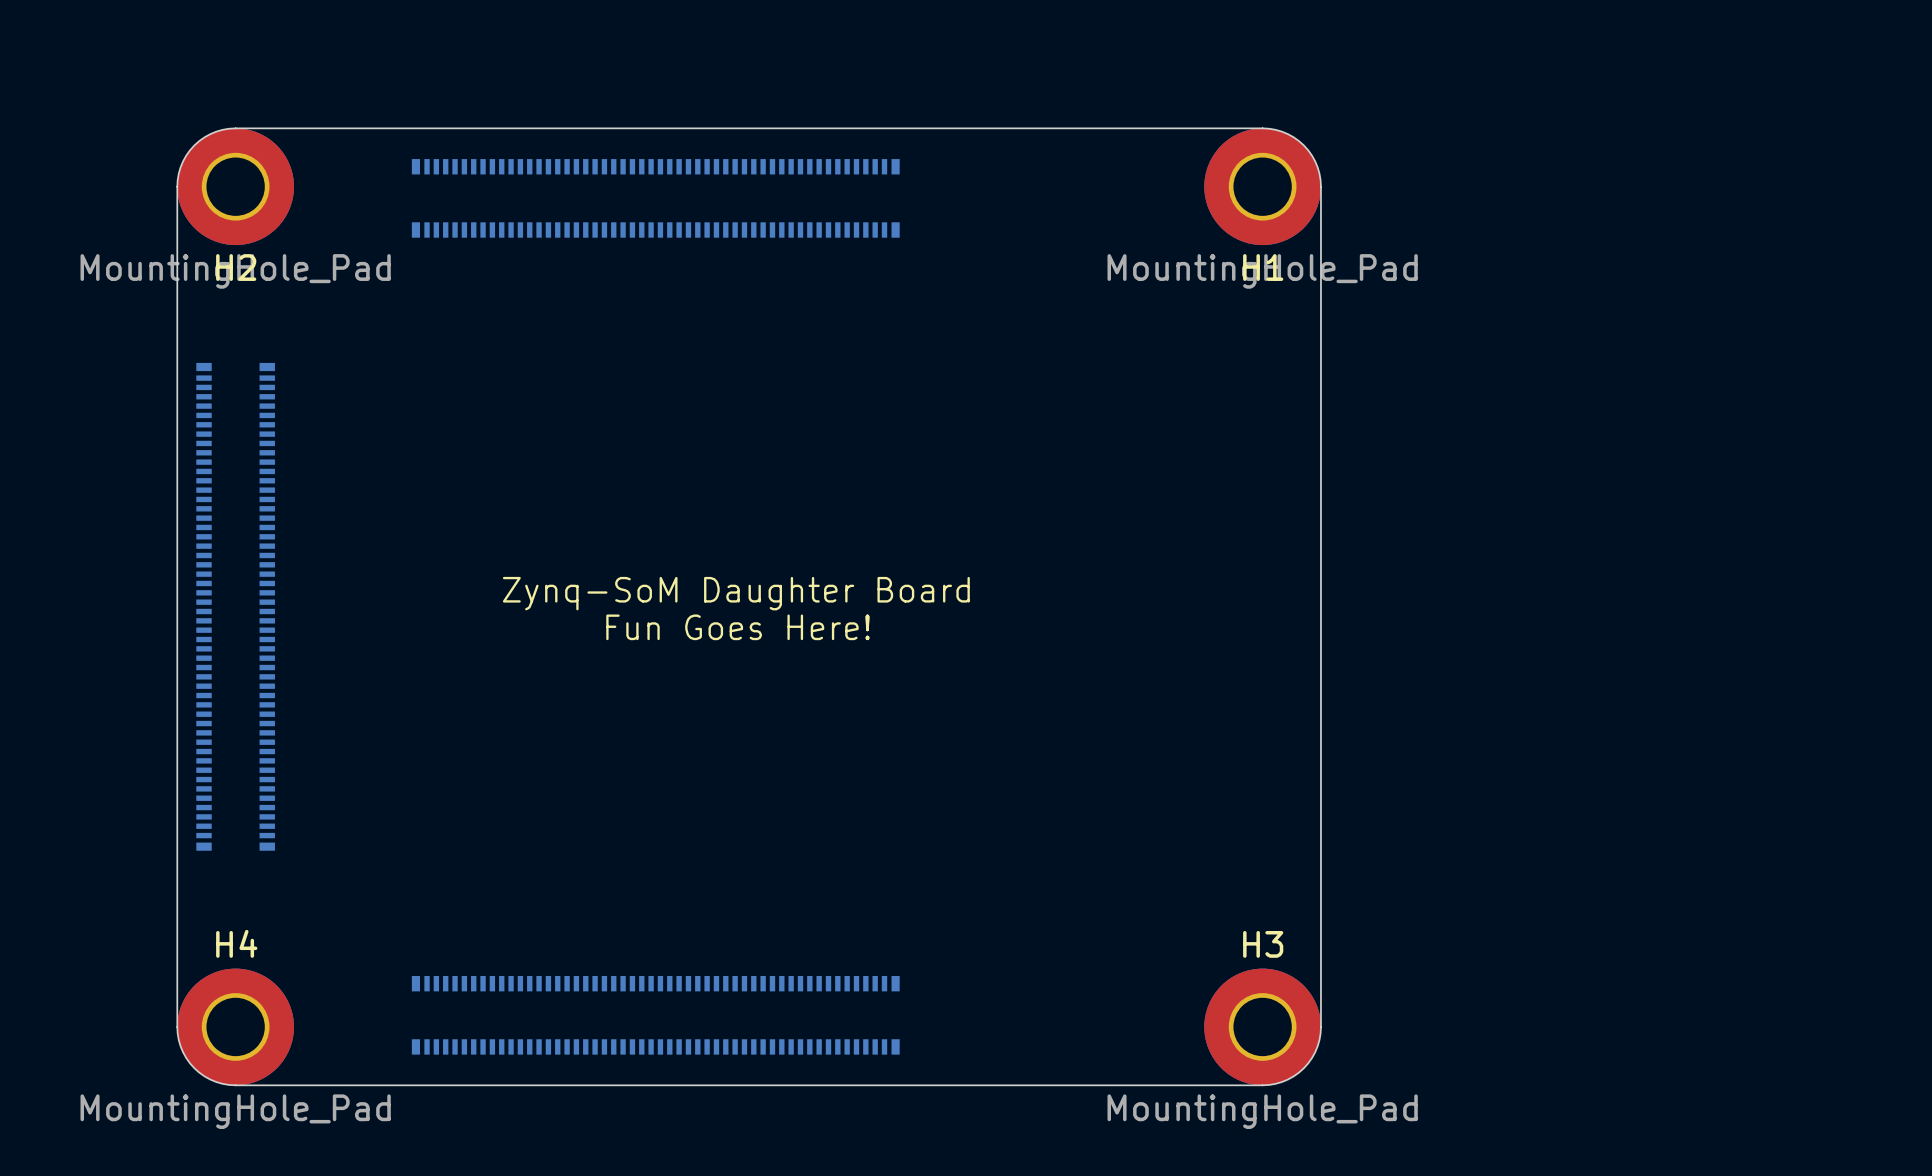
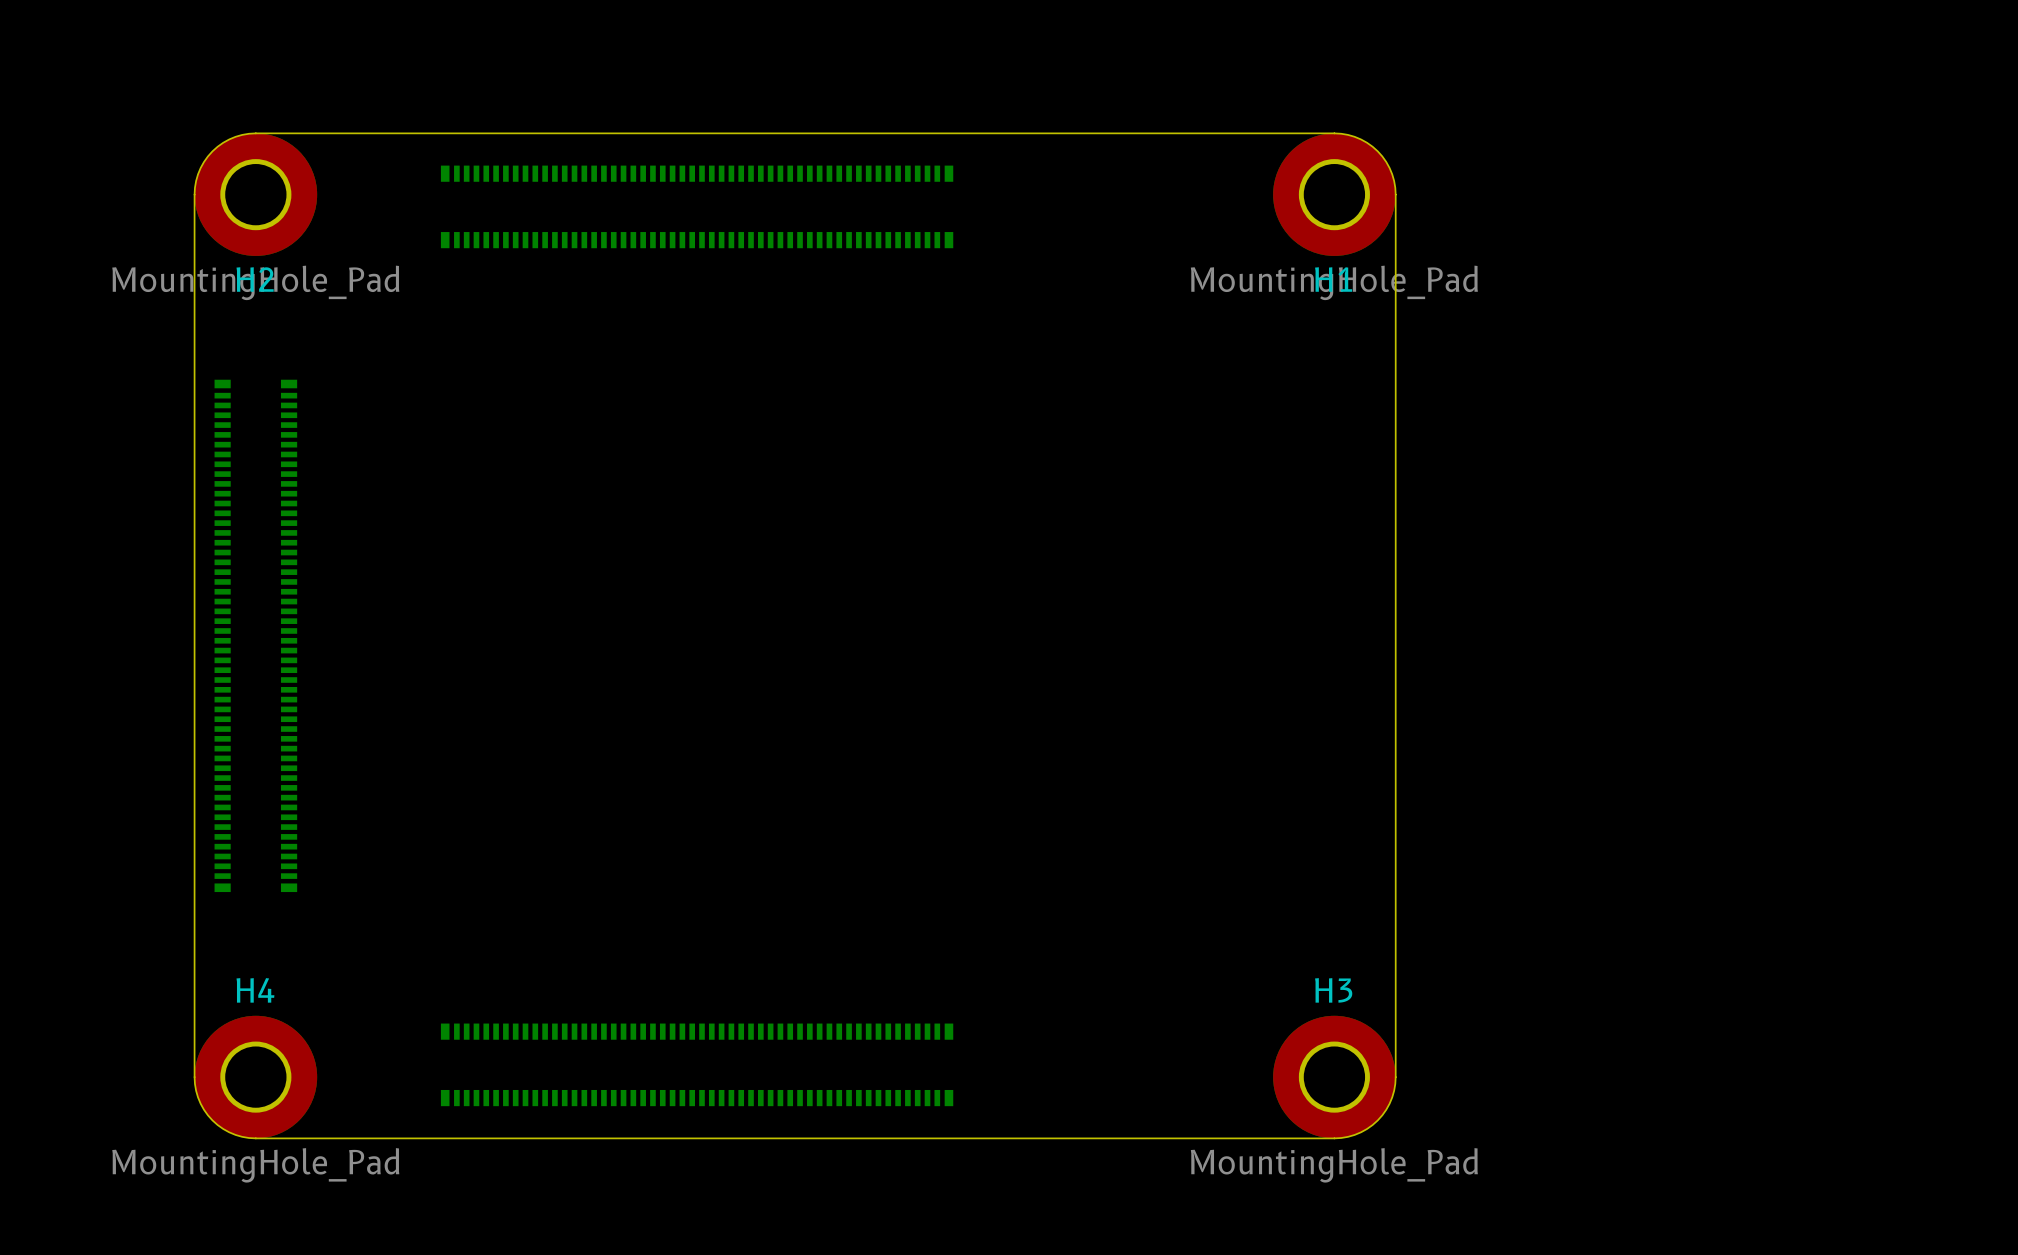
text: Zynq-SoM Daughter Board (736, 593) -> none
text: Fun Goes Here! (738, 627) -> none

